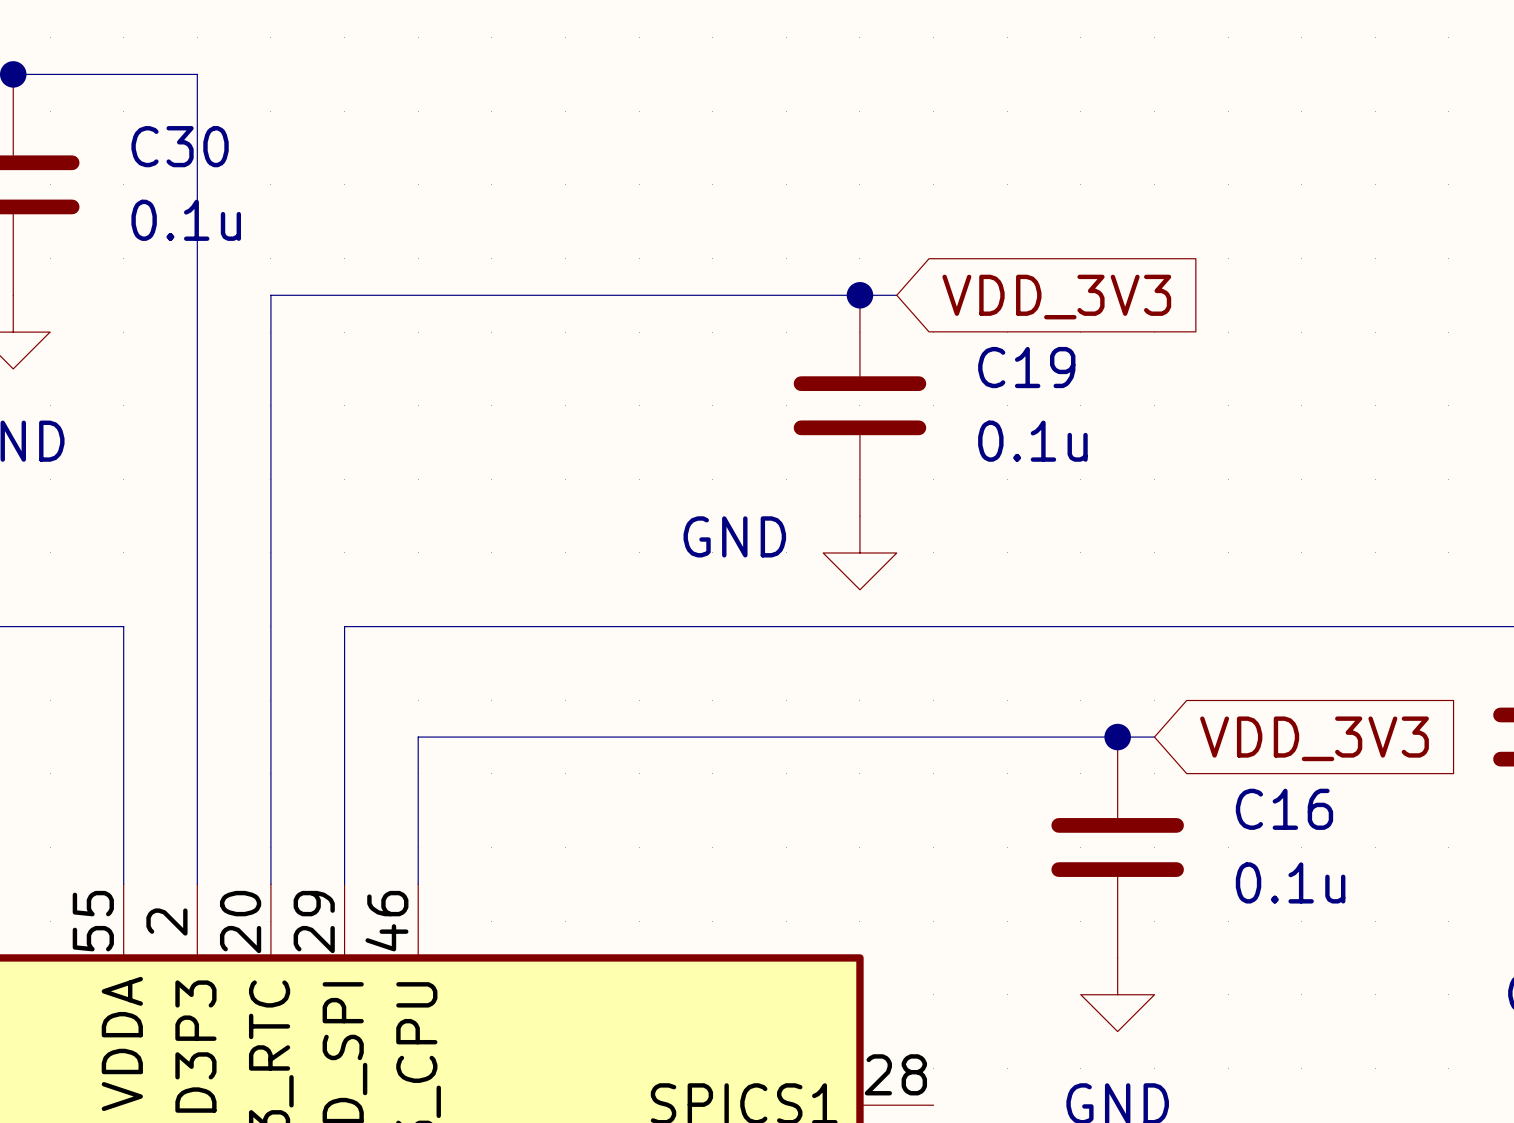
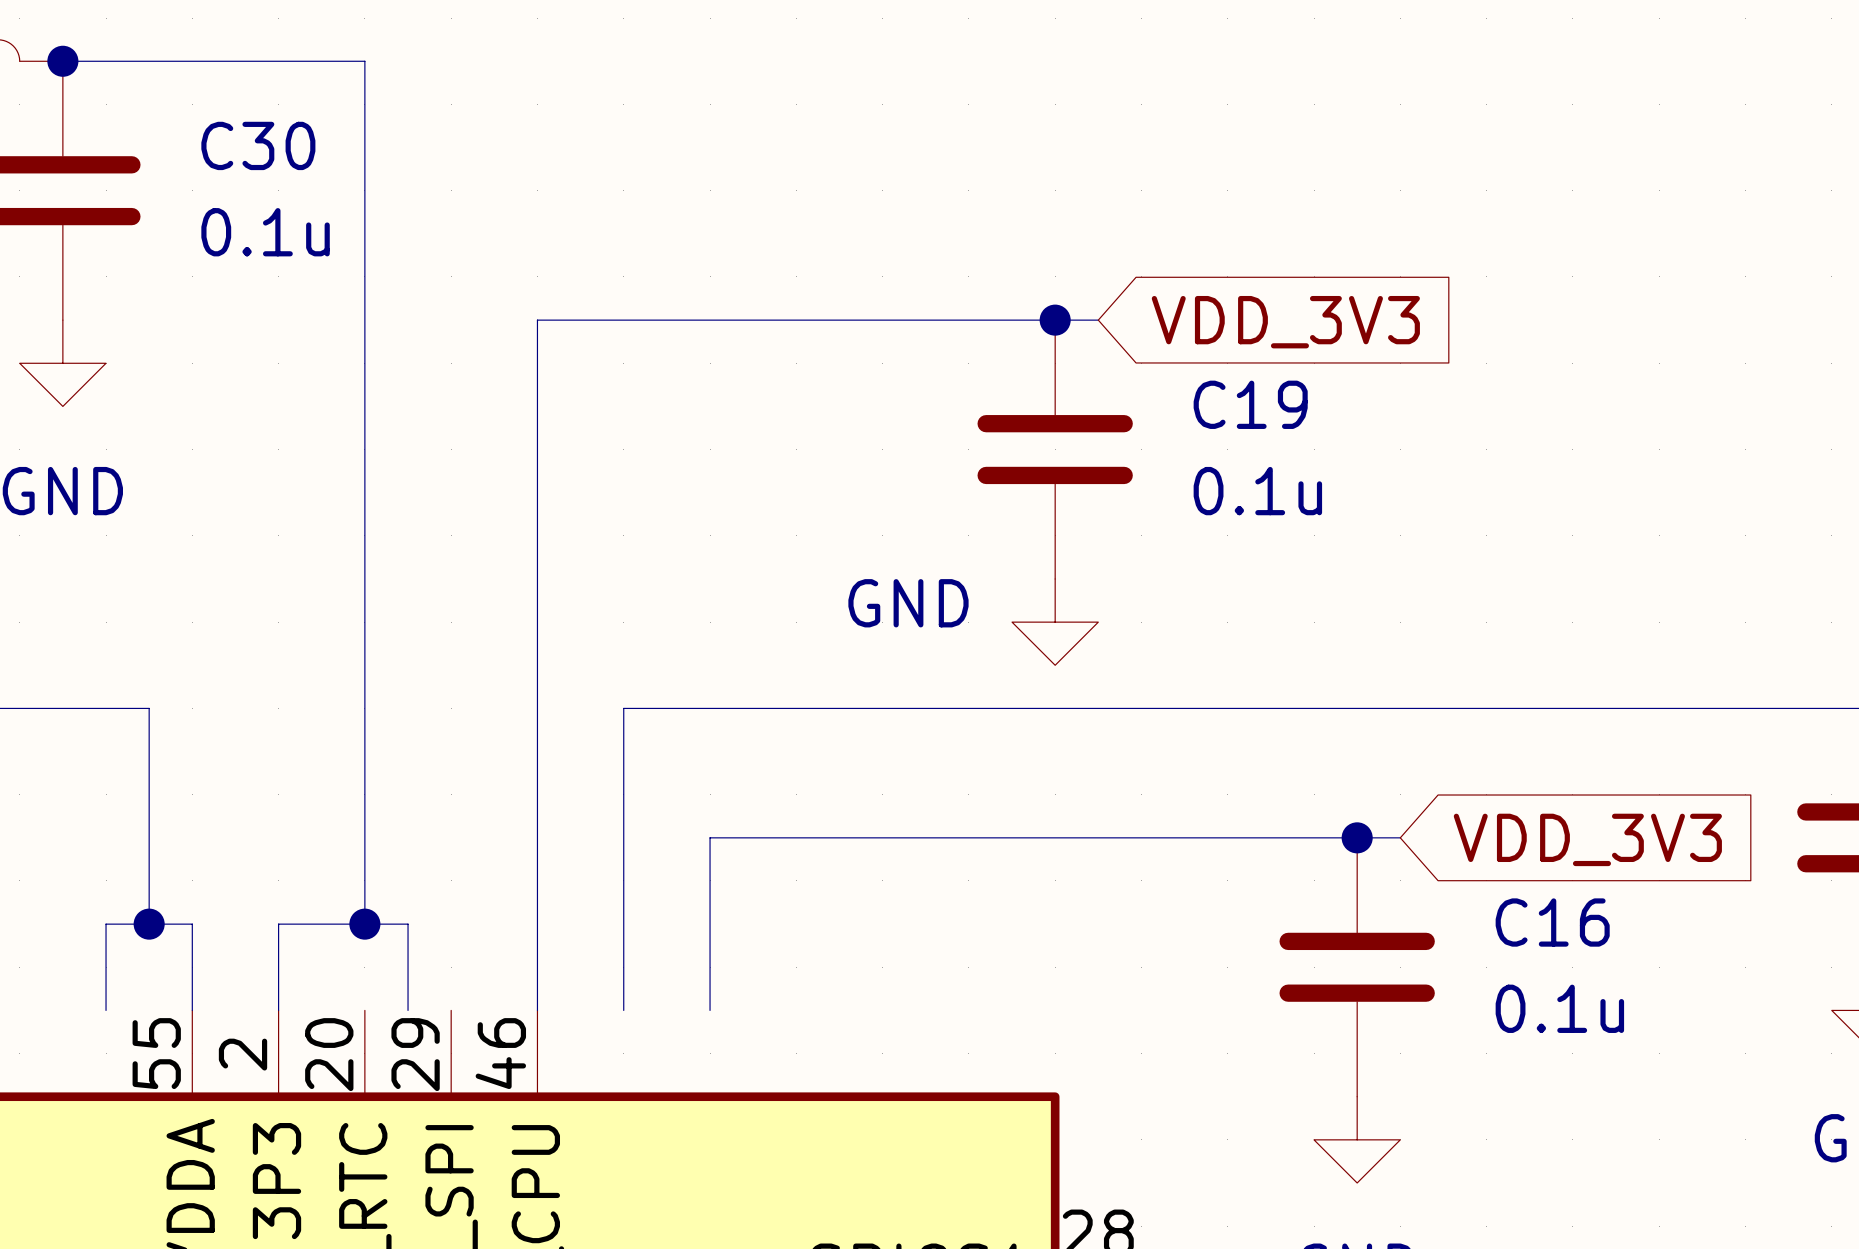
wire: (197, 74) (197, 810) -> (408, 1010) (408, 924) (278, 924)
wire: (270, 295) (418, 295) -> (364, 320) (364, 61) (278, 61)
wire: none -> (537, 320) (537, 837)
wire: (86, 626) (123, 626) (123, 810) -> (149, 708) (149, 924)
wire: (491, 626) (344, 626) (344, 884) -> (623, 708) (623, 1010)
wire: (418, 737) (565, 737) -> (710, 1010) (710, 837)
junction: none -> (149, 924)
wire: none -> (192, 924) (106, 924) (106, 1010)
wire: (270, 810) (270, 884) -> none
junction: none -> (364, 924)

